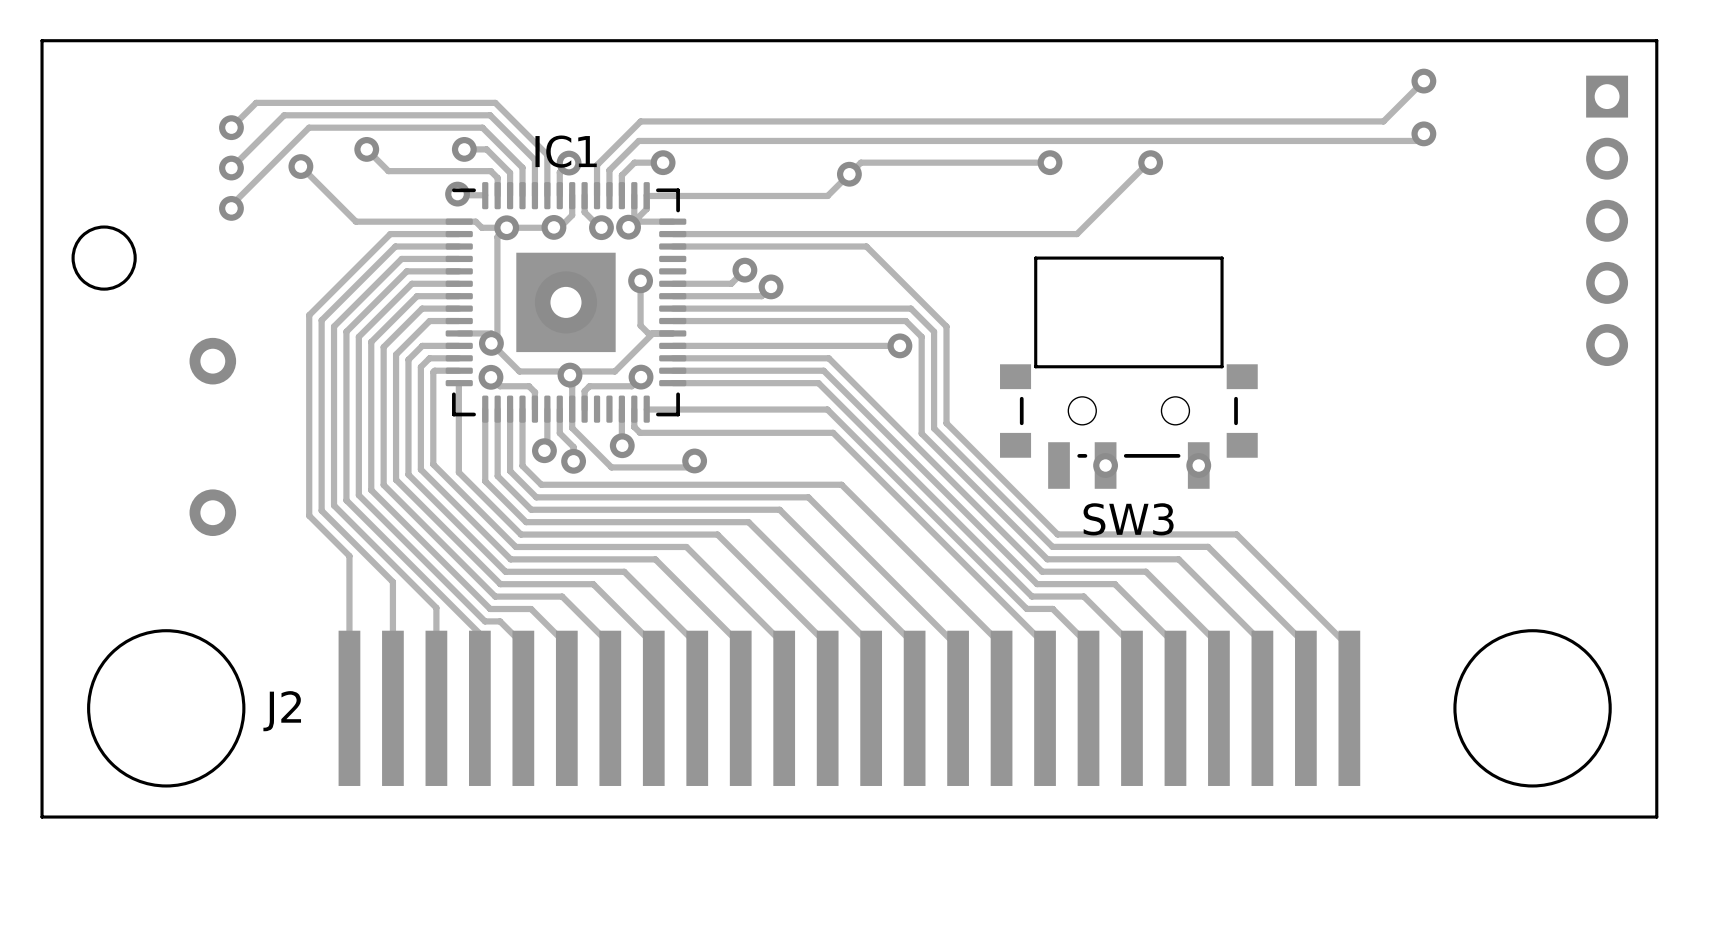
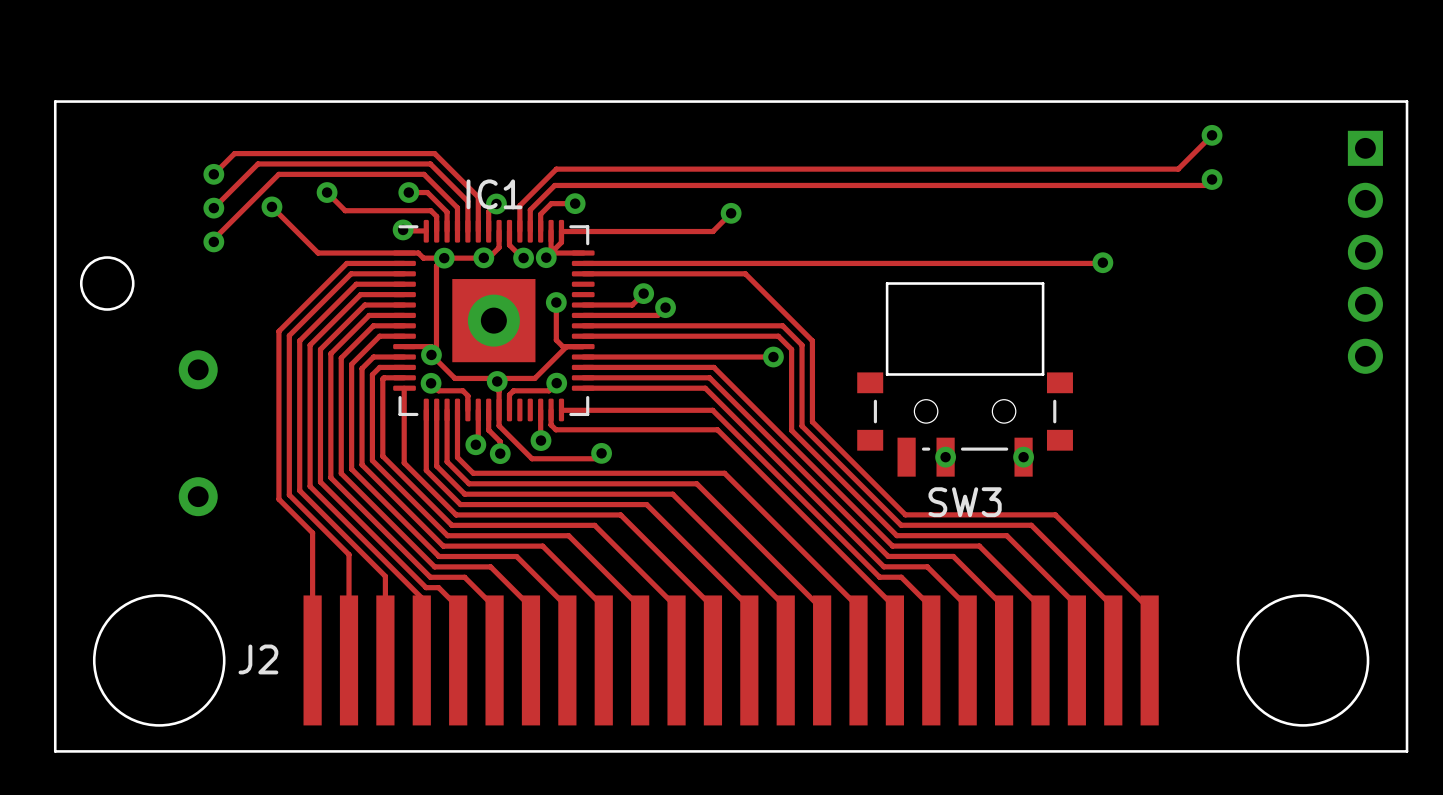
track: (1050, 162) (860, 162) (849, 174) -> none
via: (1050, 162) -> none
track: (1150, 162) (1148, 162) (1077, 234) -> (1102, 262) (921, 263)
via: (1150, 162) -> none
via: none -> (1102, 262)

